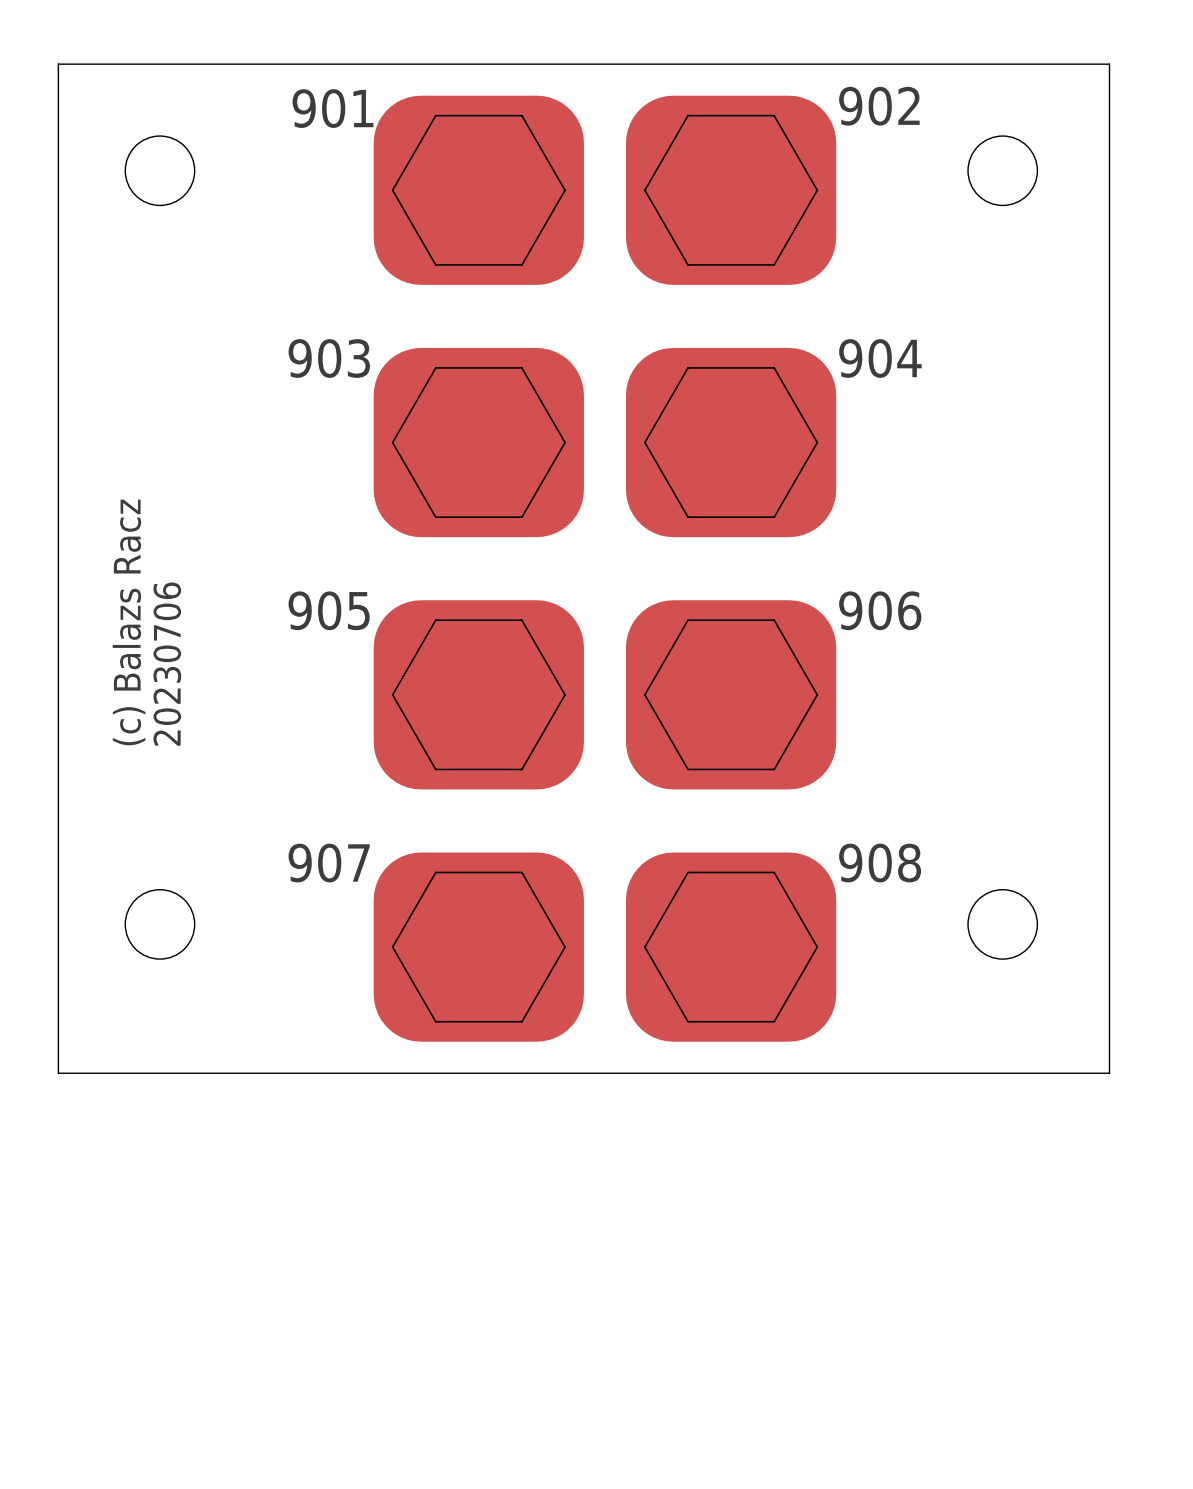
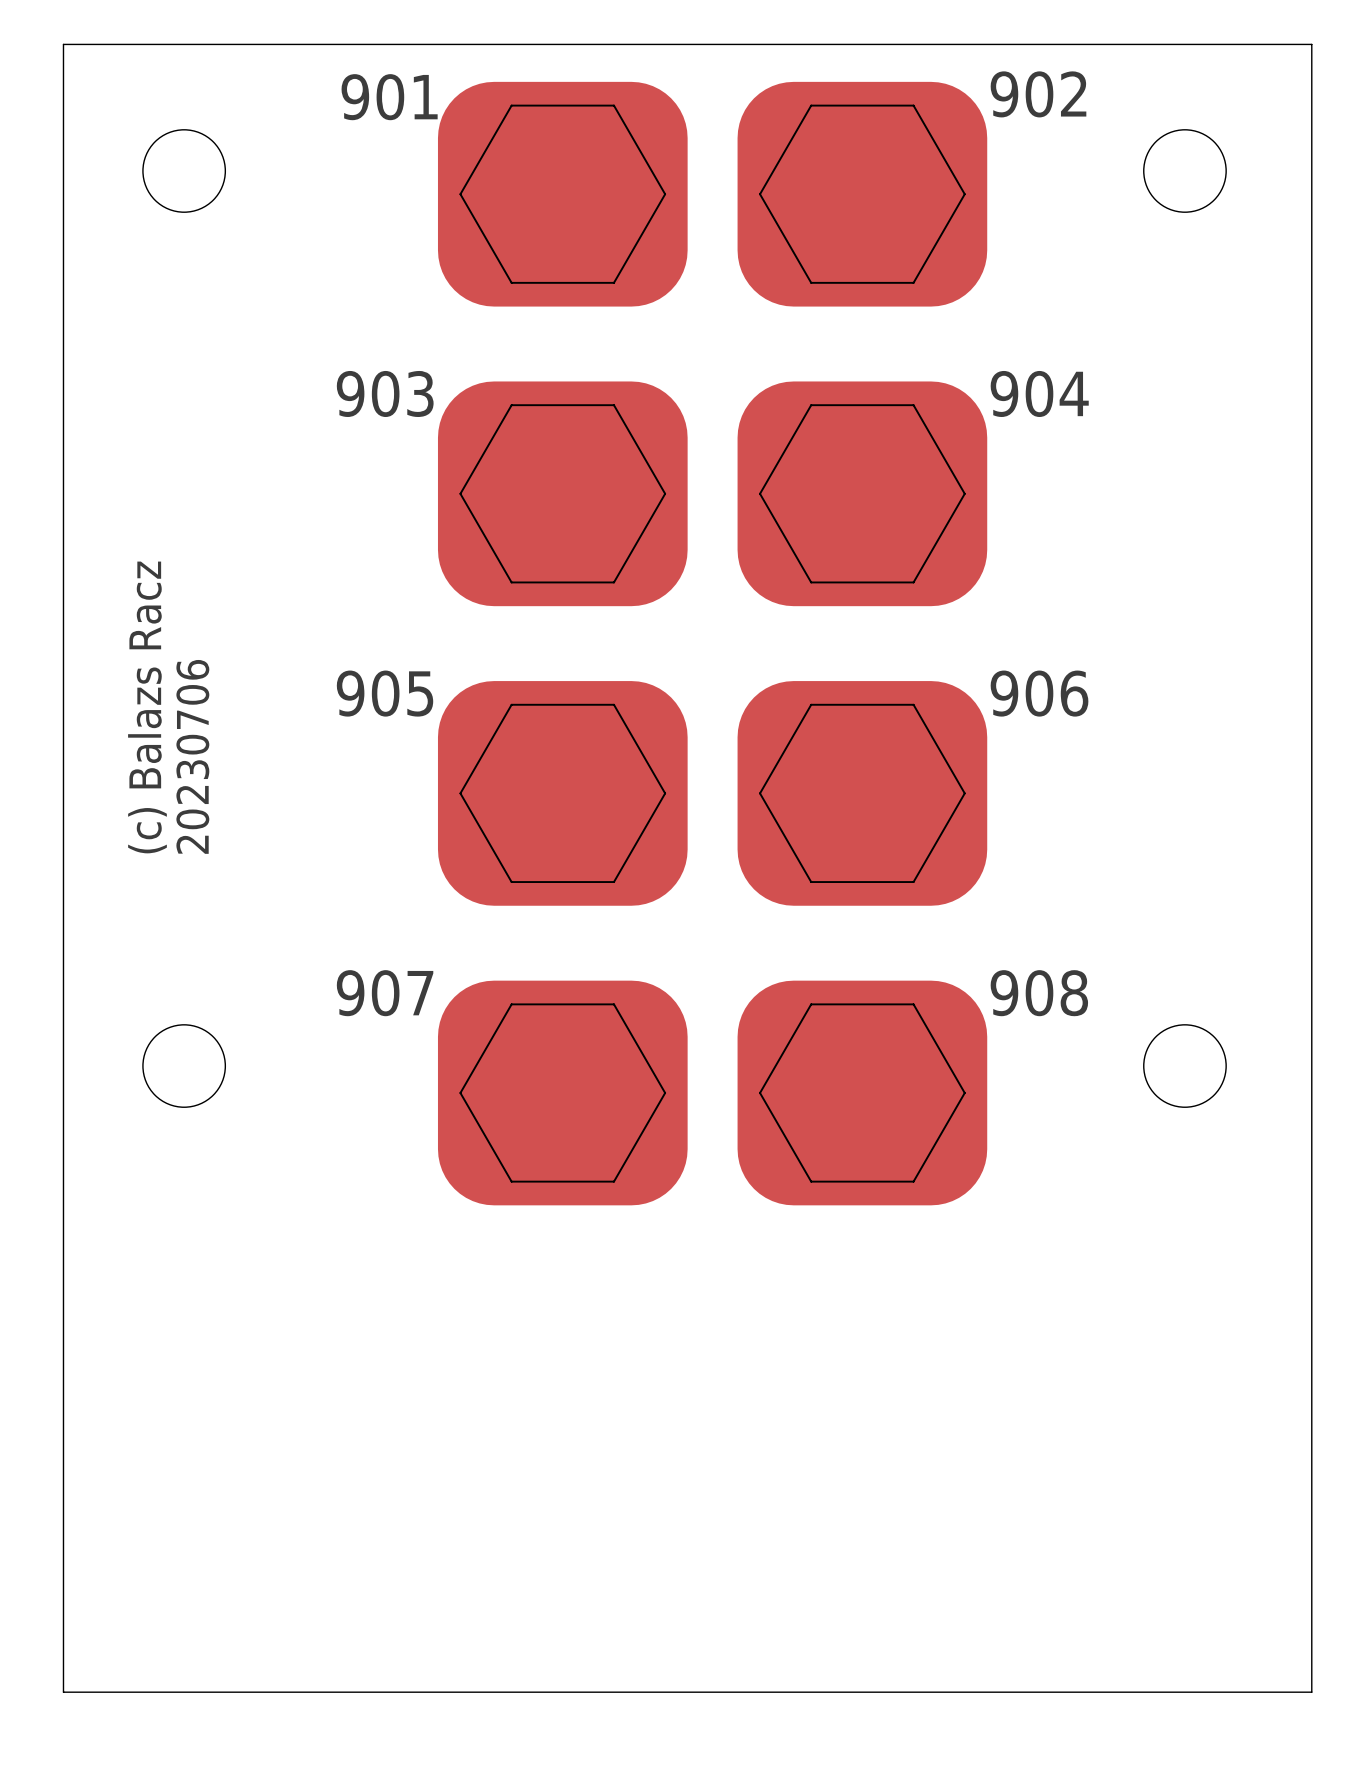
board edge: (58, 1073) (1109, 1073) -> (63, 1242) (63, 1692) (1311, 1692) (1311, 1242)

